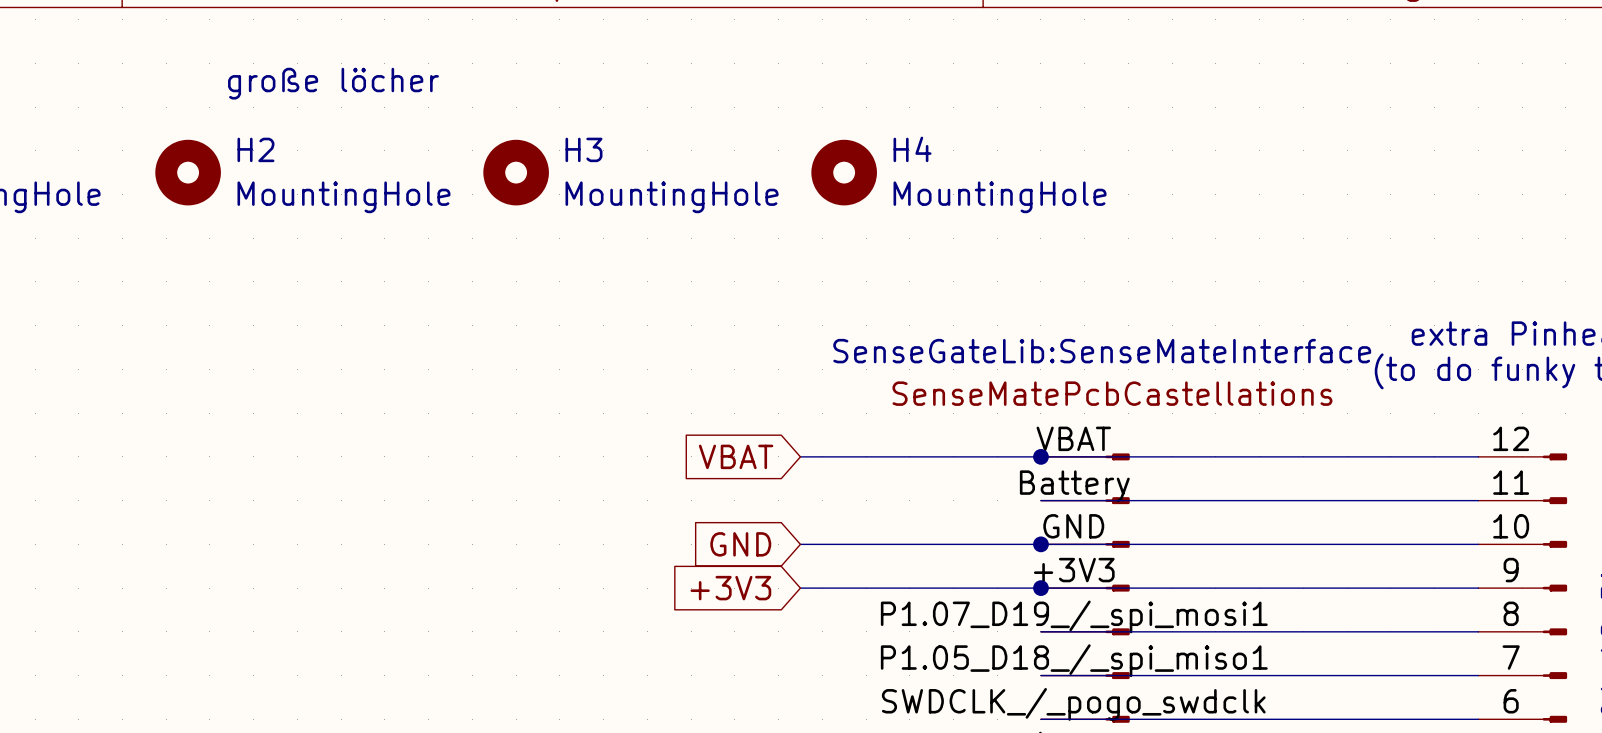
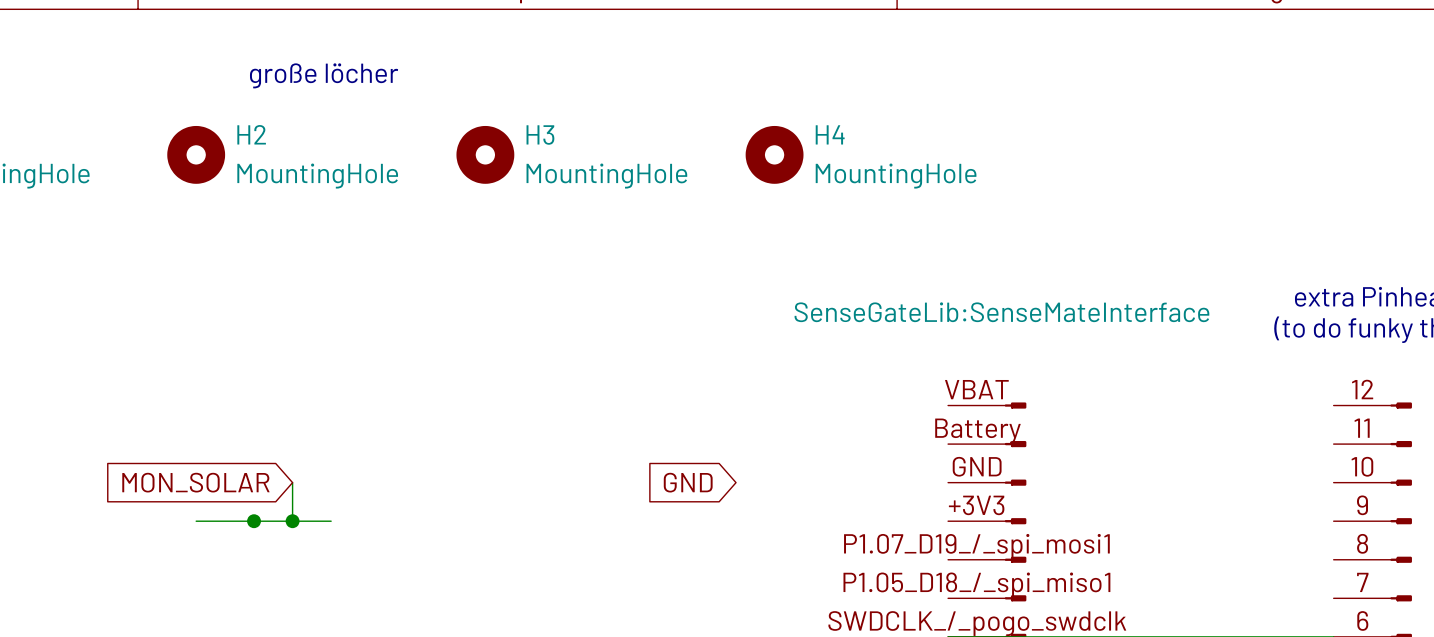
label: SenseMatePcbCastellations (1112, 393) -> none
global label: VBAT (736, 456) -> none
wire: (800, 456) (1478, 456) -> none
junction: (1040, 456) -> none
wire: (1040, 500) (1478, 500) -> none
wire: none -> (292, 482) (292, 521)
wire: (800, 544) (1478, 544) -> none
junction: (1040, 544) -> none
global label: none -> MON_SOLAR (195, 482)
wire: none -> (196, 521) (331, 521)
junction: none -> (254, 521)
junction: none -> (292, 521)
global label: +3V3 (730, 588) -> none
wire: (800, 588) (1478, 588) -> none
junction: (1040, 588) -> none
wire: (1040, 631) (1478, 631) -> none
wire: (1040, 675) (1478, 675) -> none

